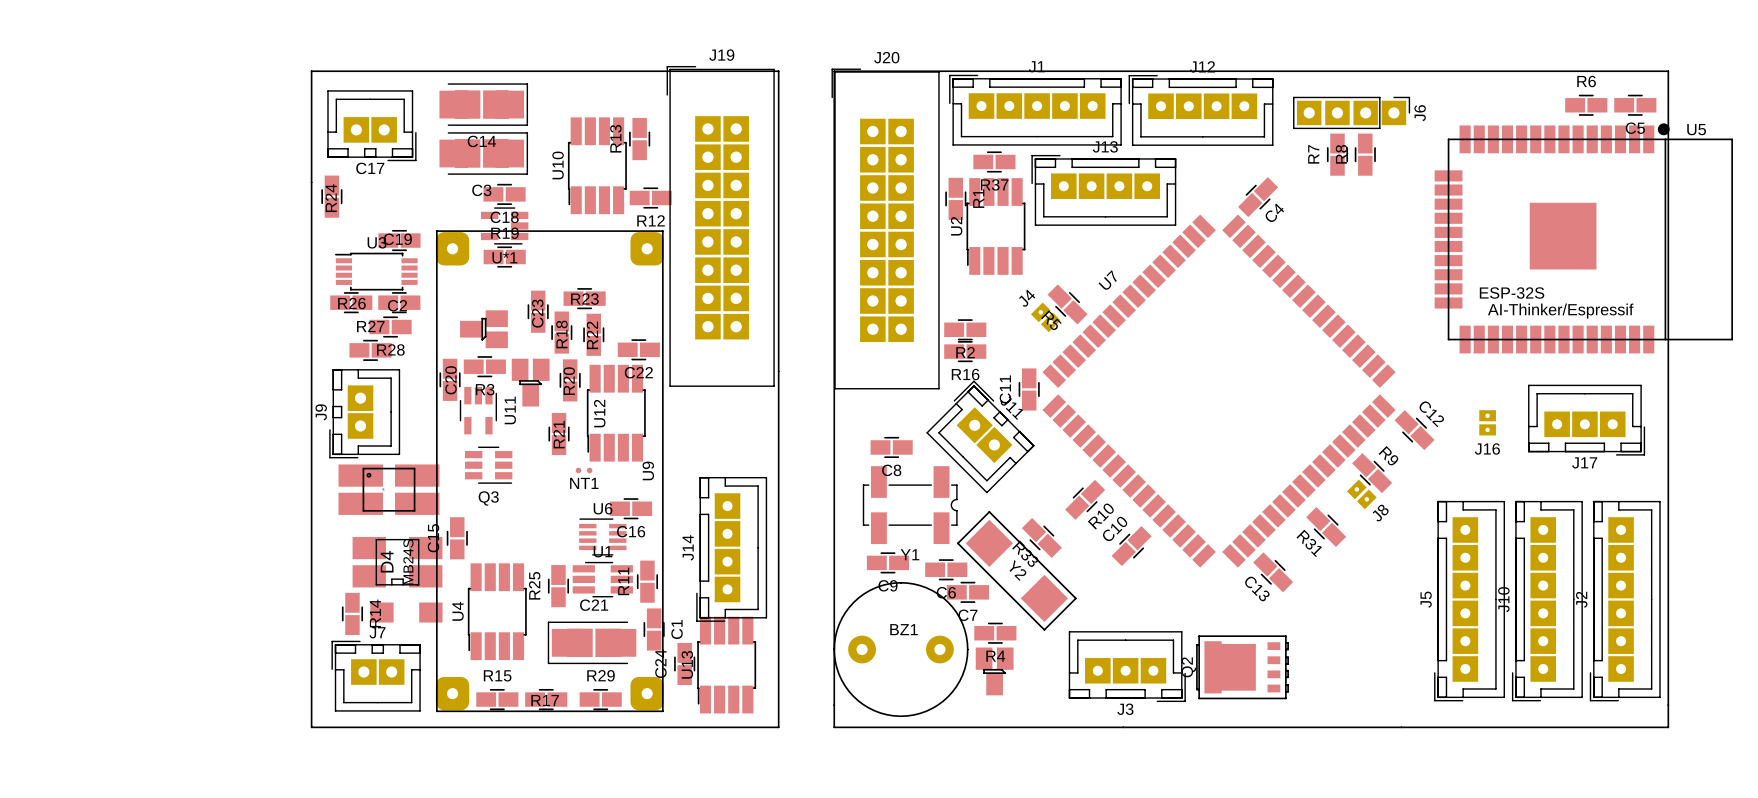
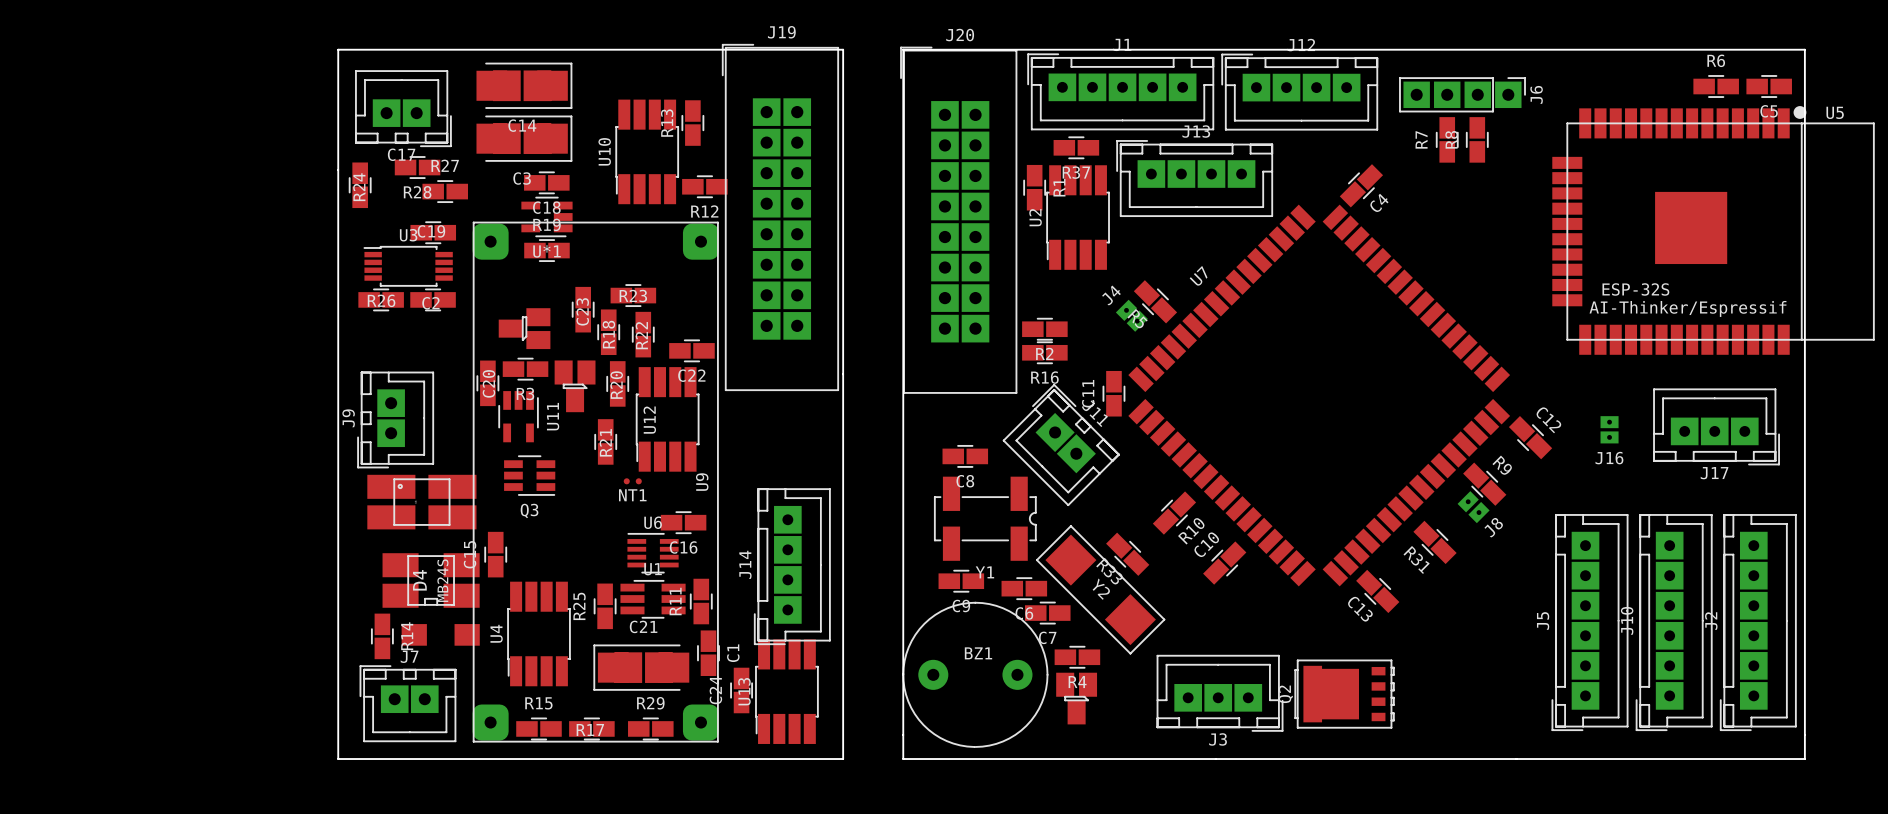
R28 position: (390, 327) -> (417, 167)
R27 position: (370, 350) -> (445, 191)

